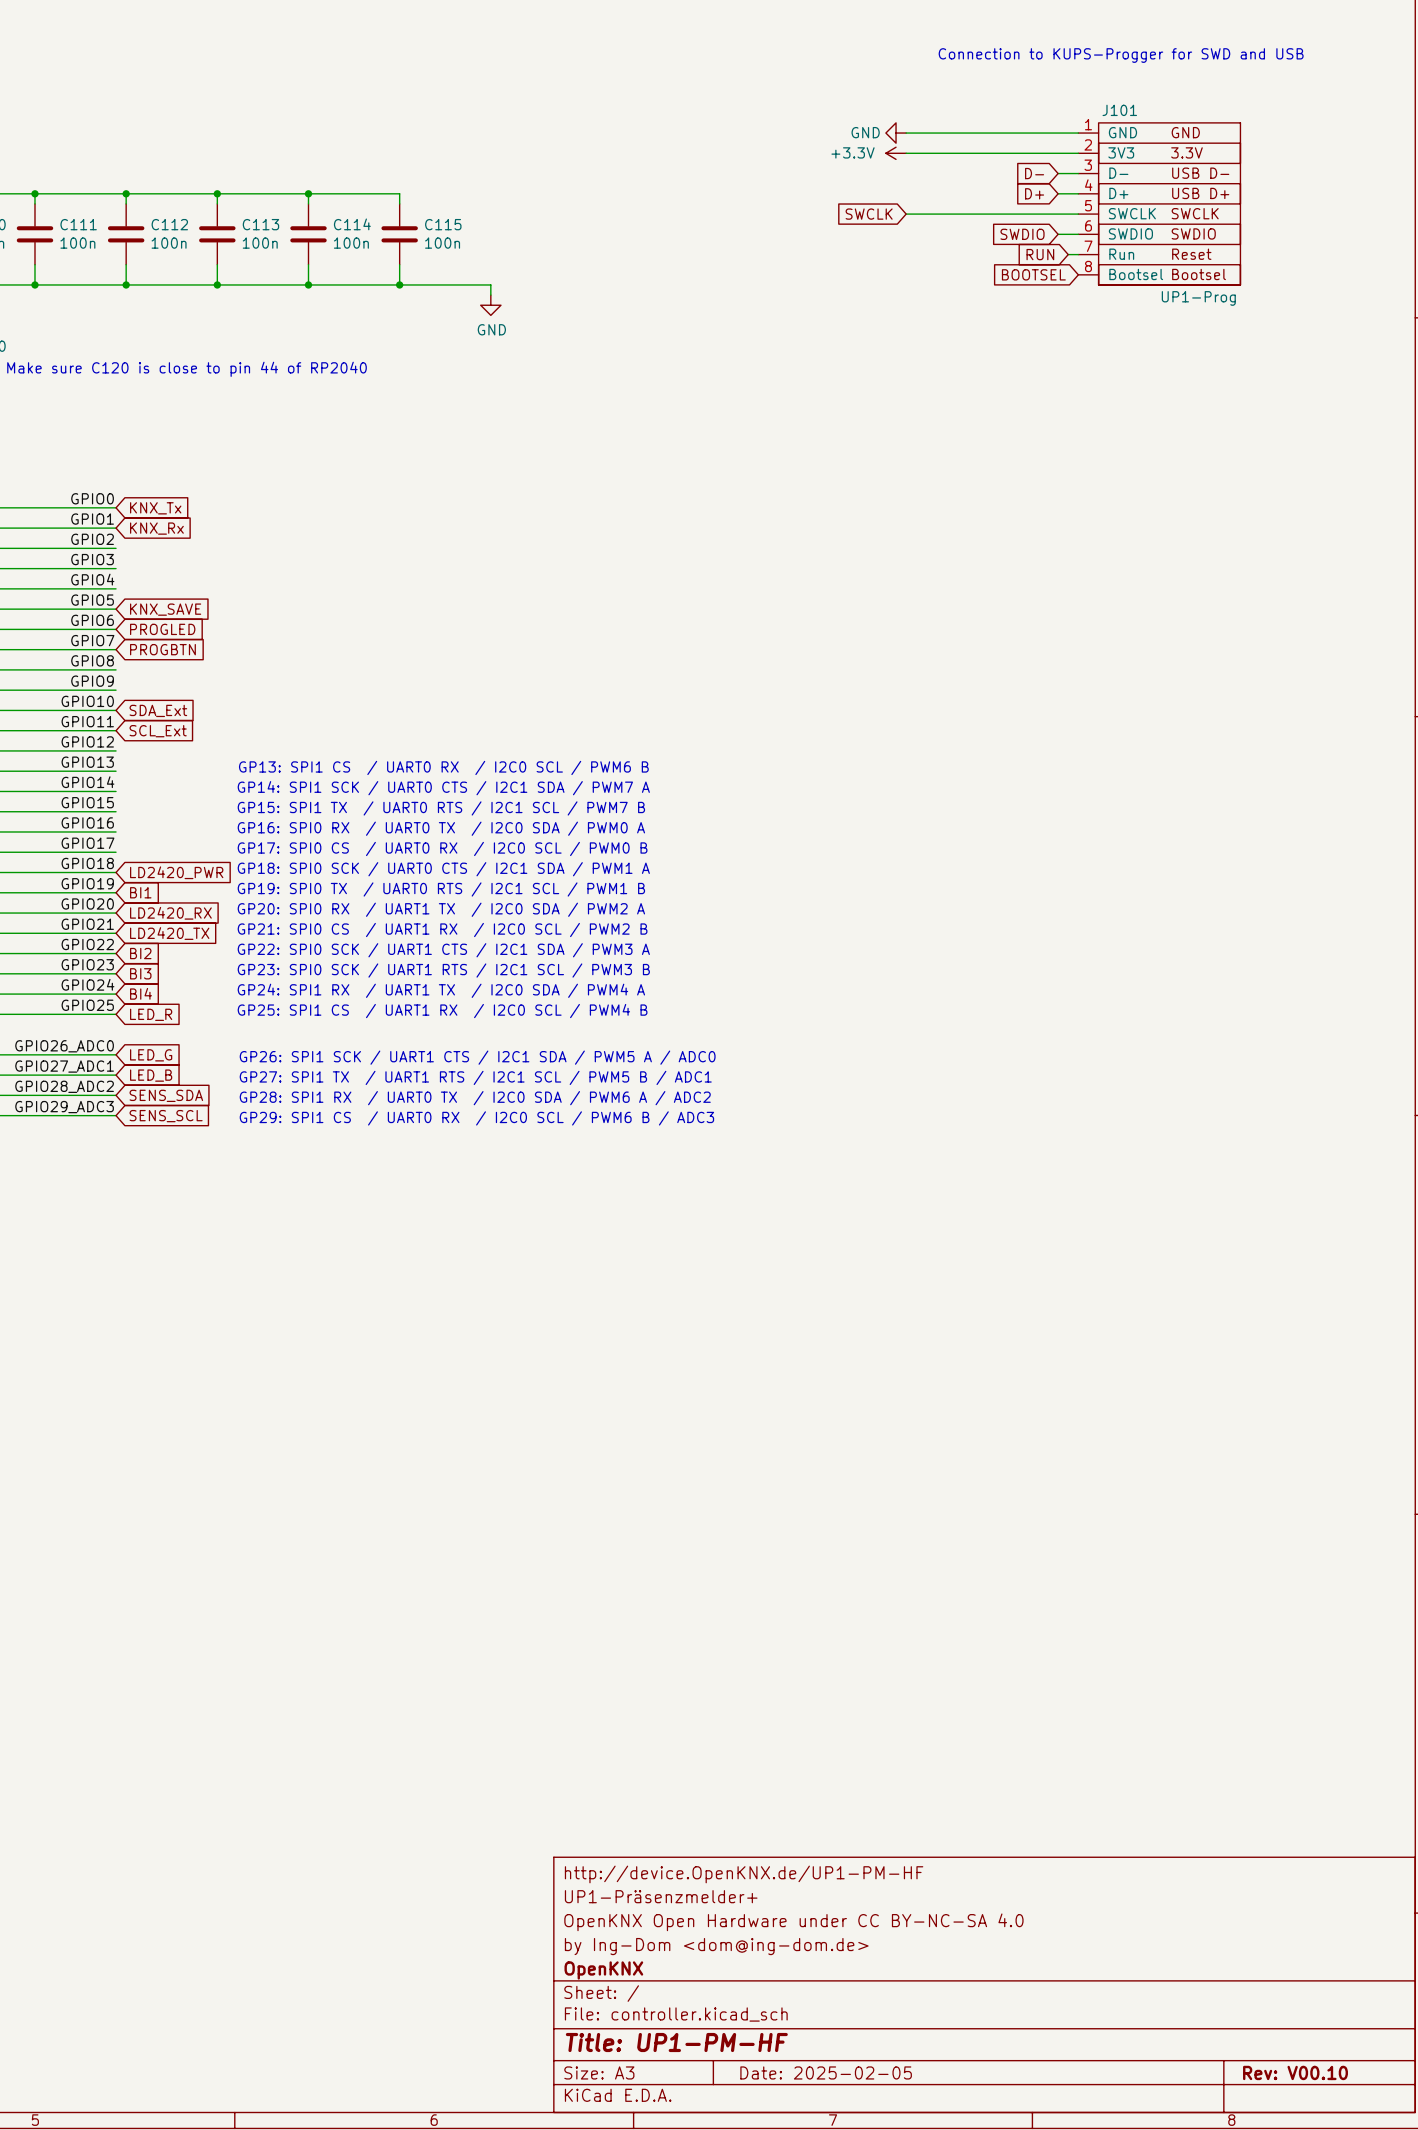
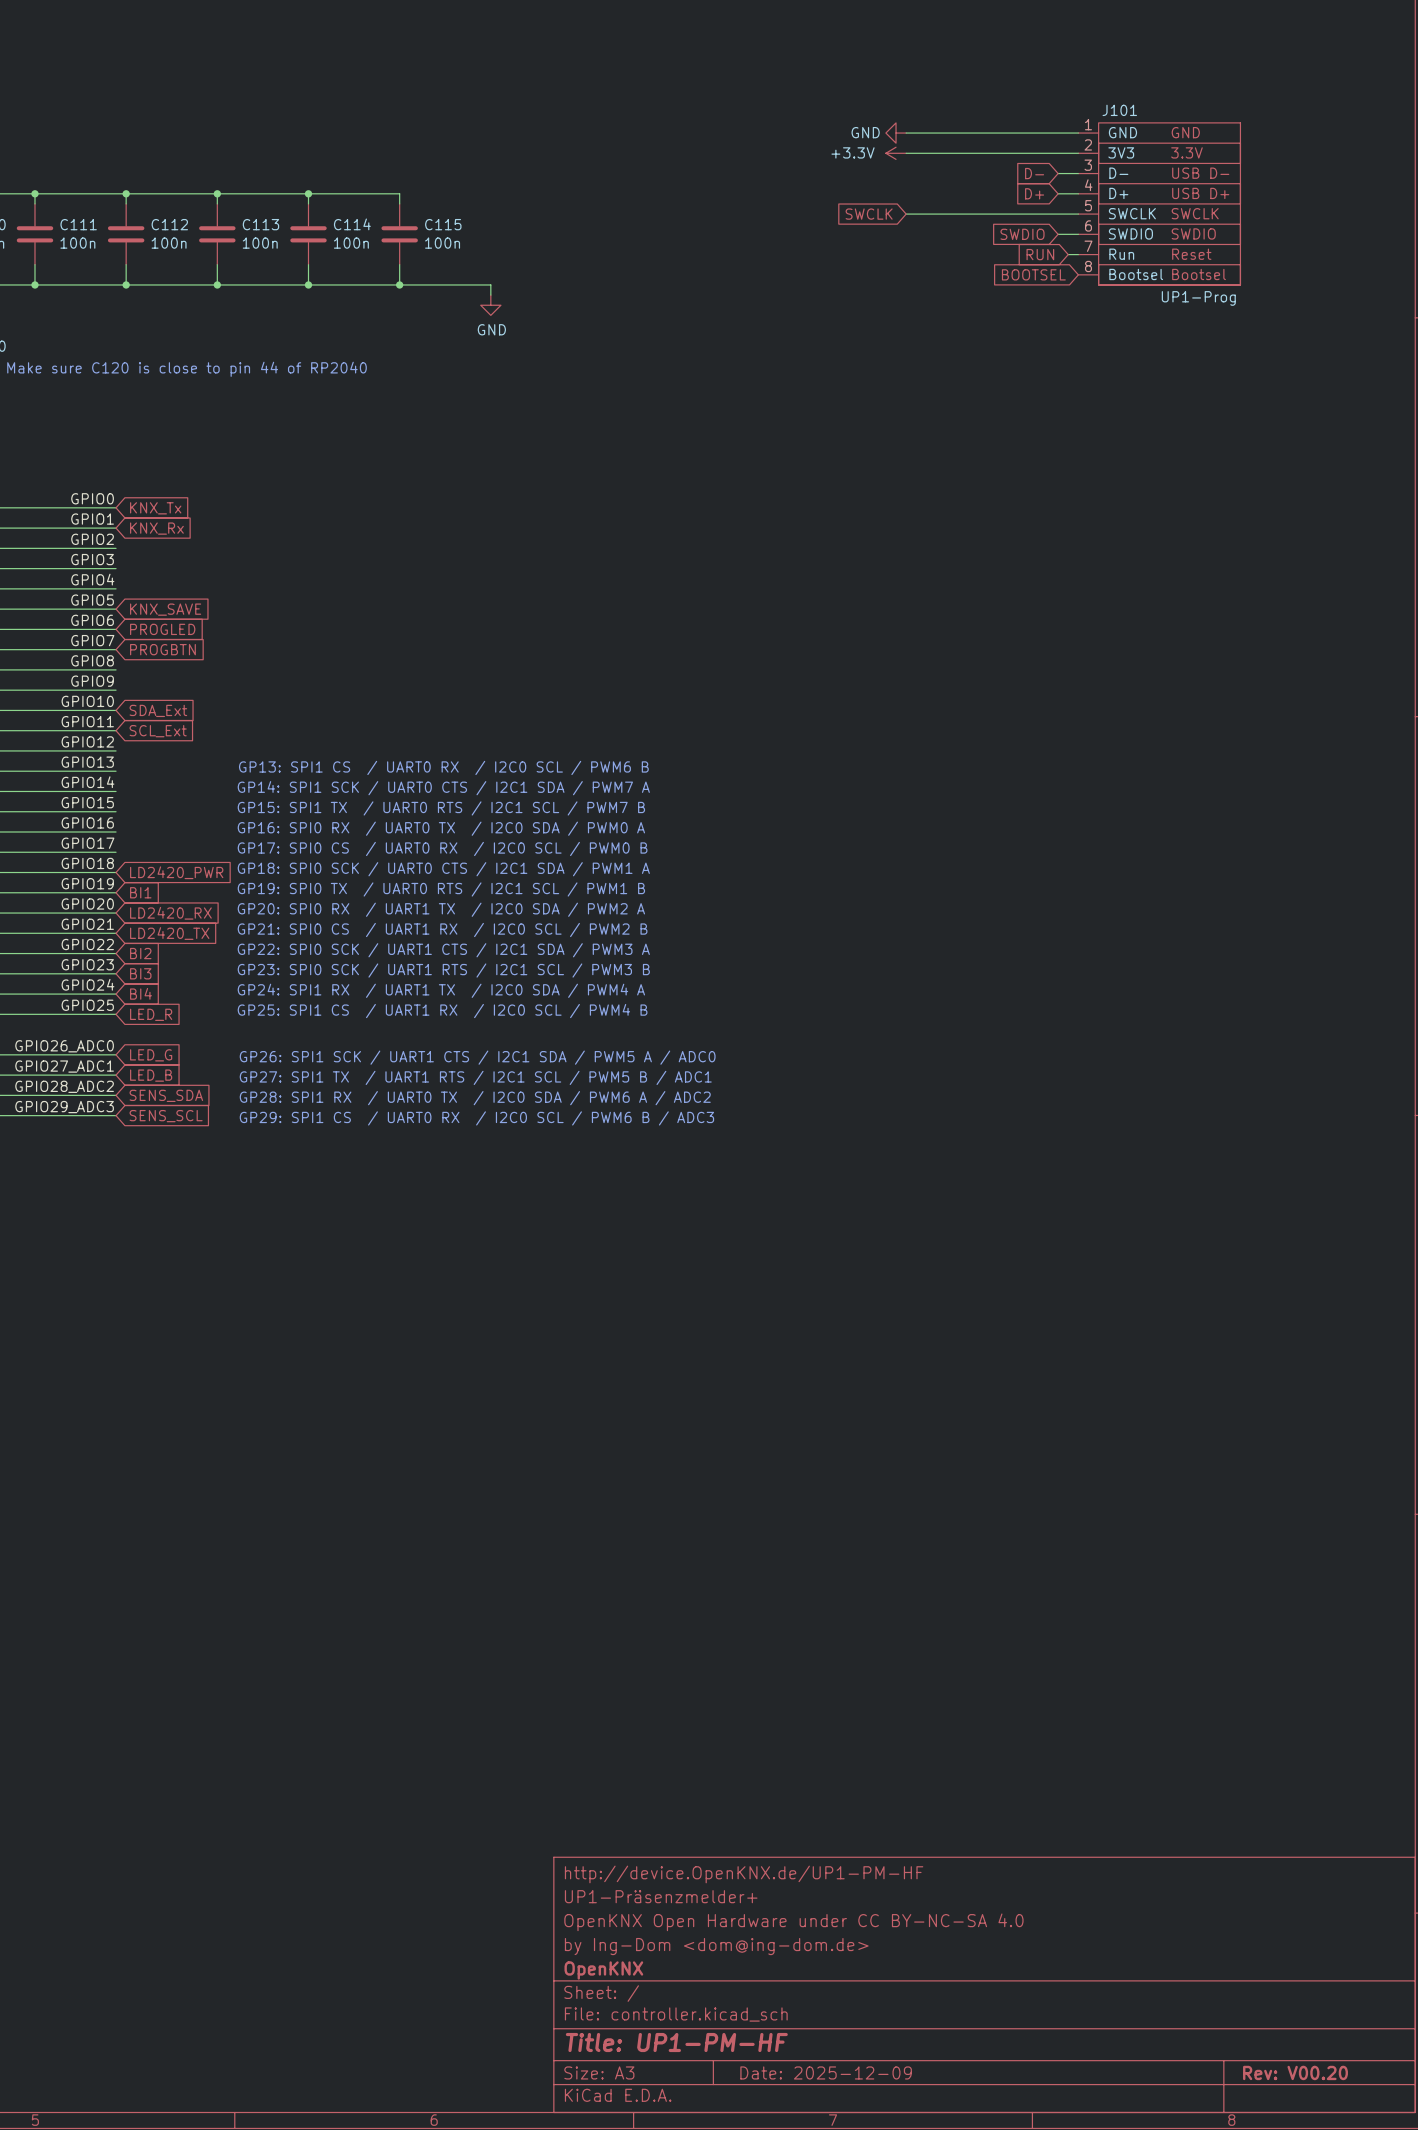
text: Connection to KUPS-Progger for SWD and USB (1121, 55) -> none
title block: Date: 2025-02-05 (826, 2072) -> Date: 2025-12-09 (826, 2072)
title block: Rev: V00.10 (1295, 2072) -> Rev: V00.20 (1295, 2072)

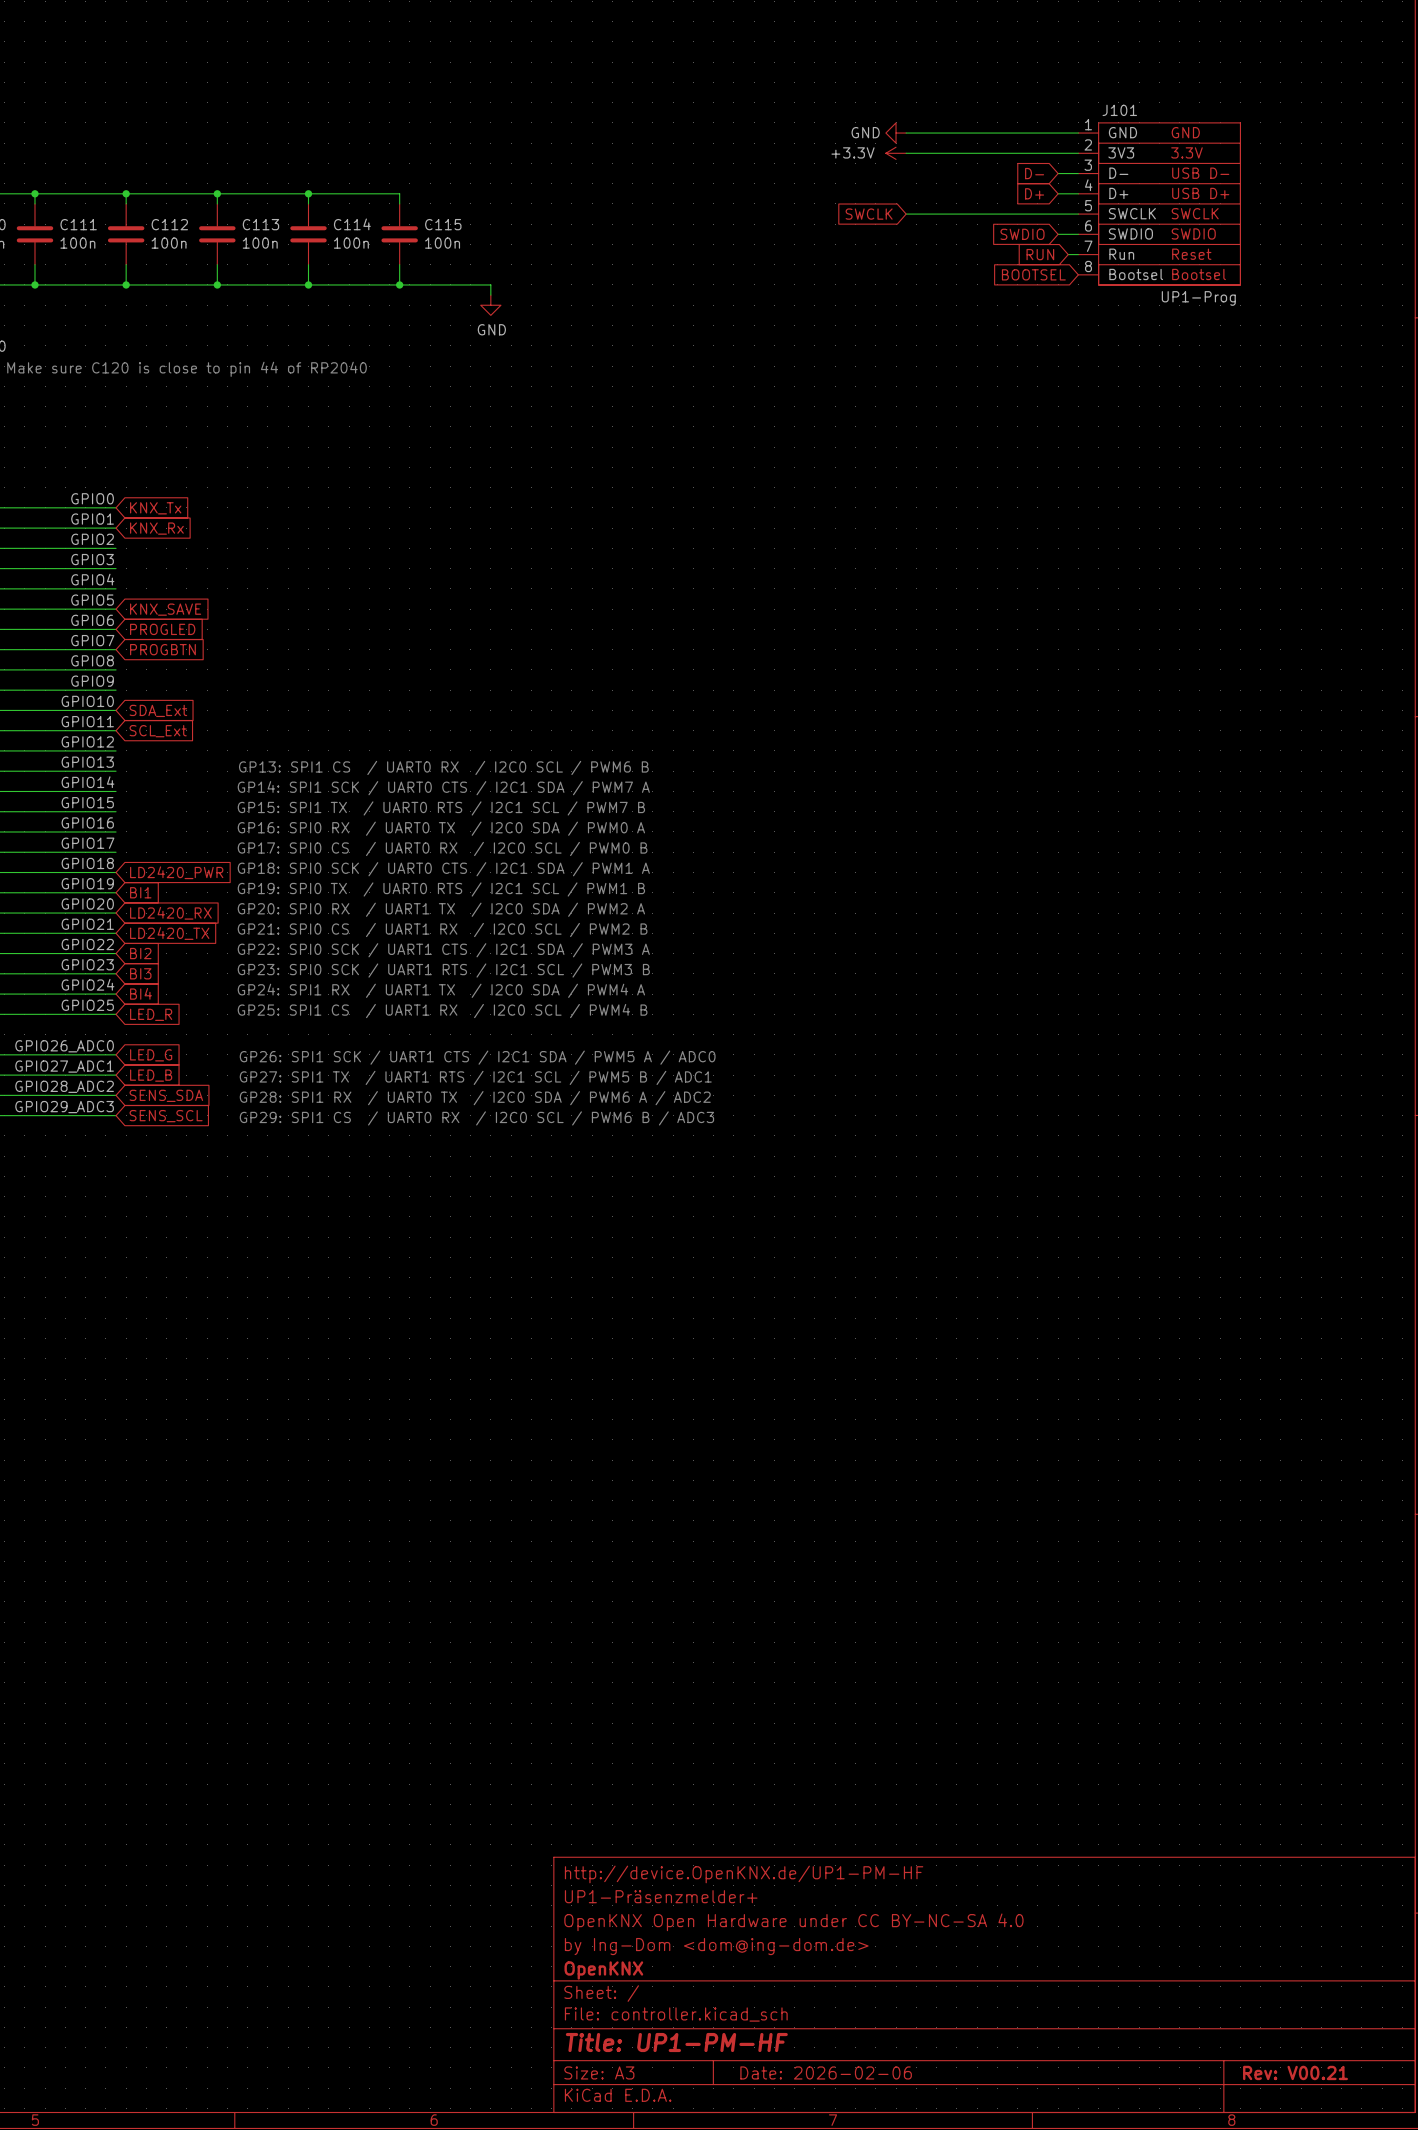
title block: Date: 2025-12-09 (826, 2072) -> Date: 2026-02-06 (826, 2072)
title block: Rev: V00.20 (1295, 2072) -> Rev: V00.21 (1295, 2072)

